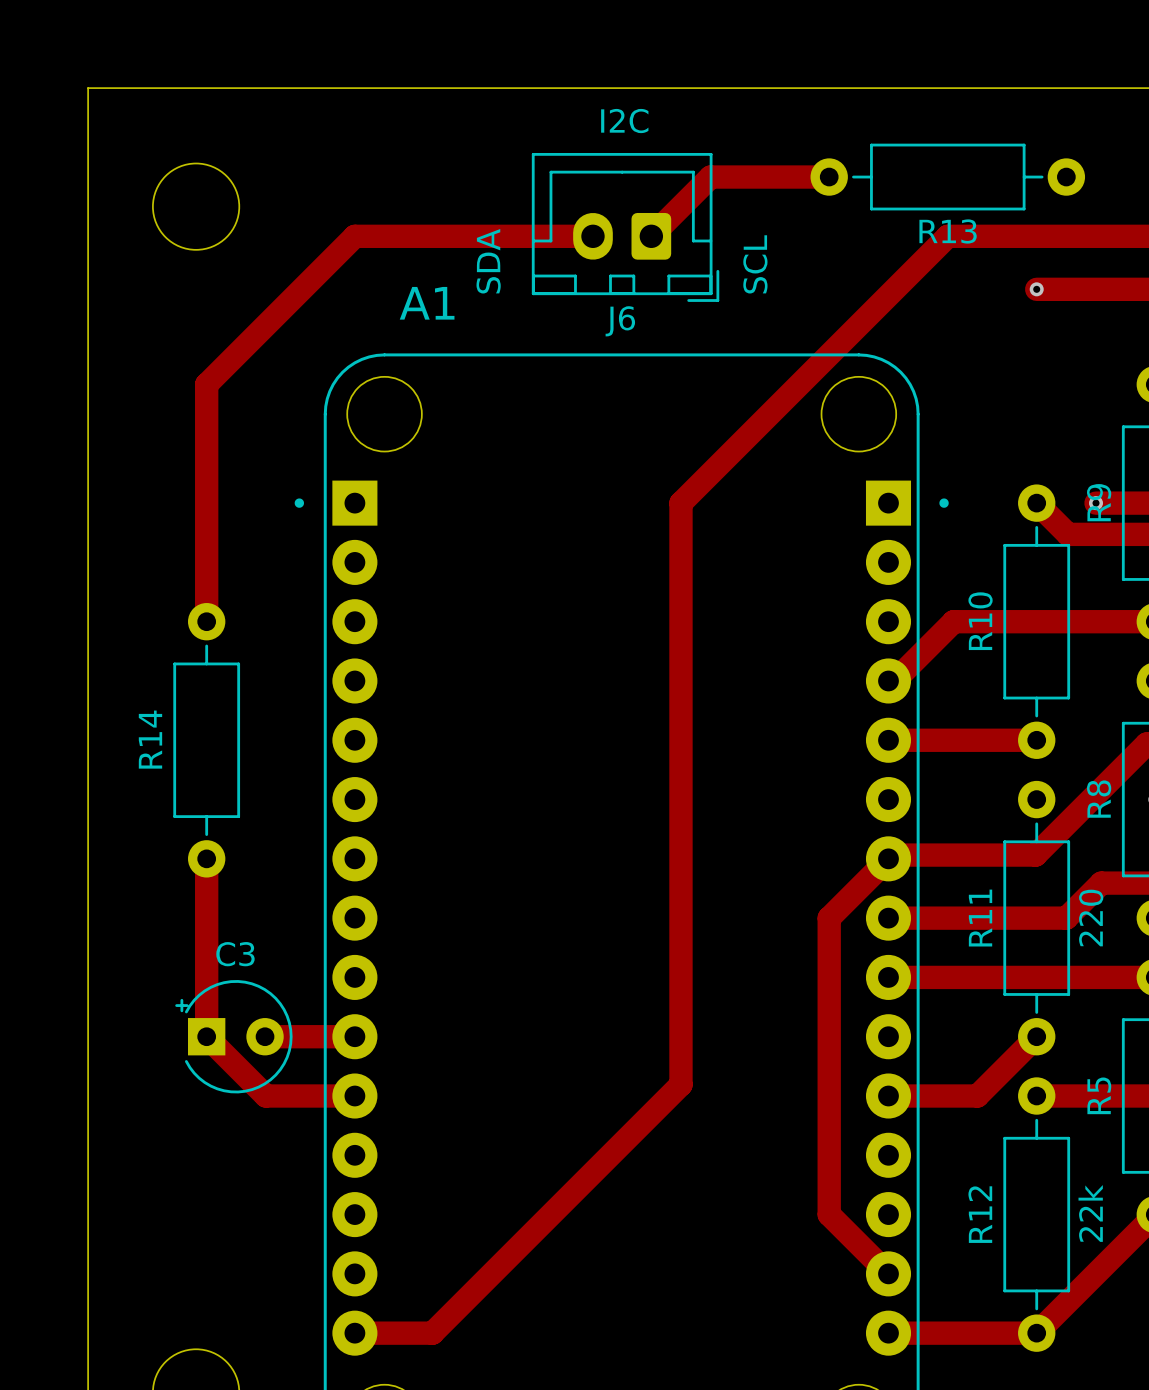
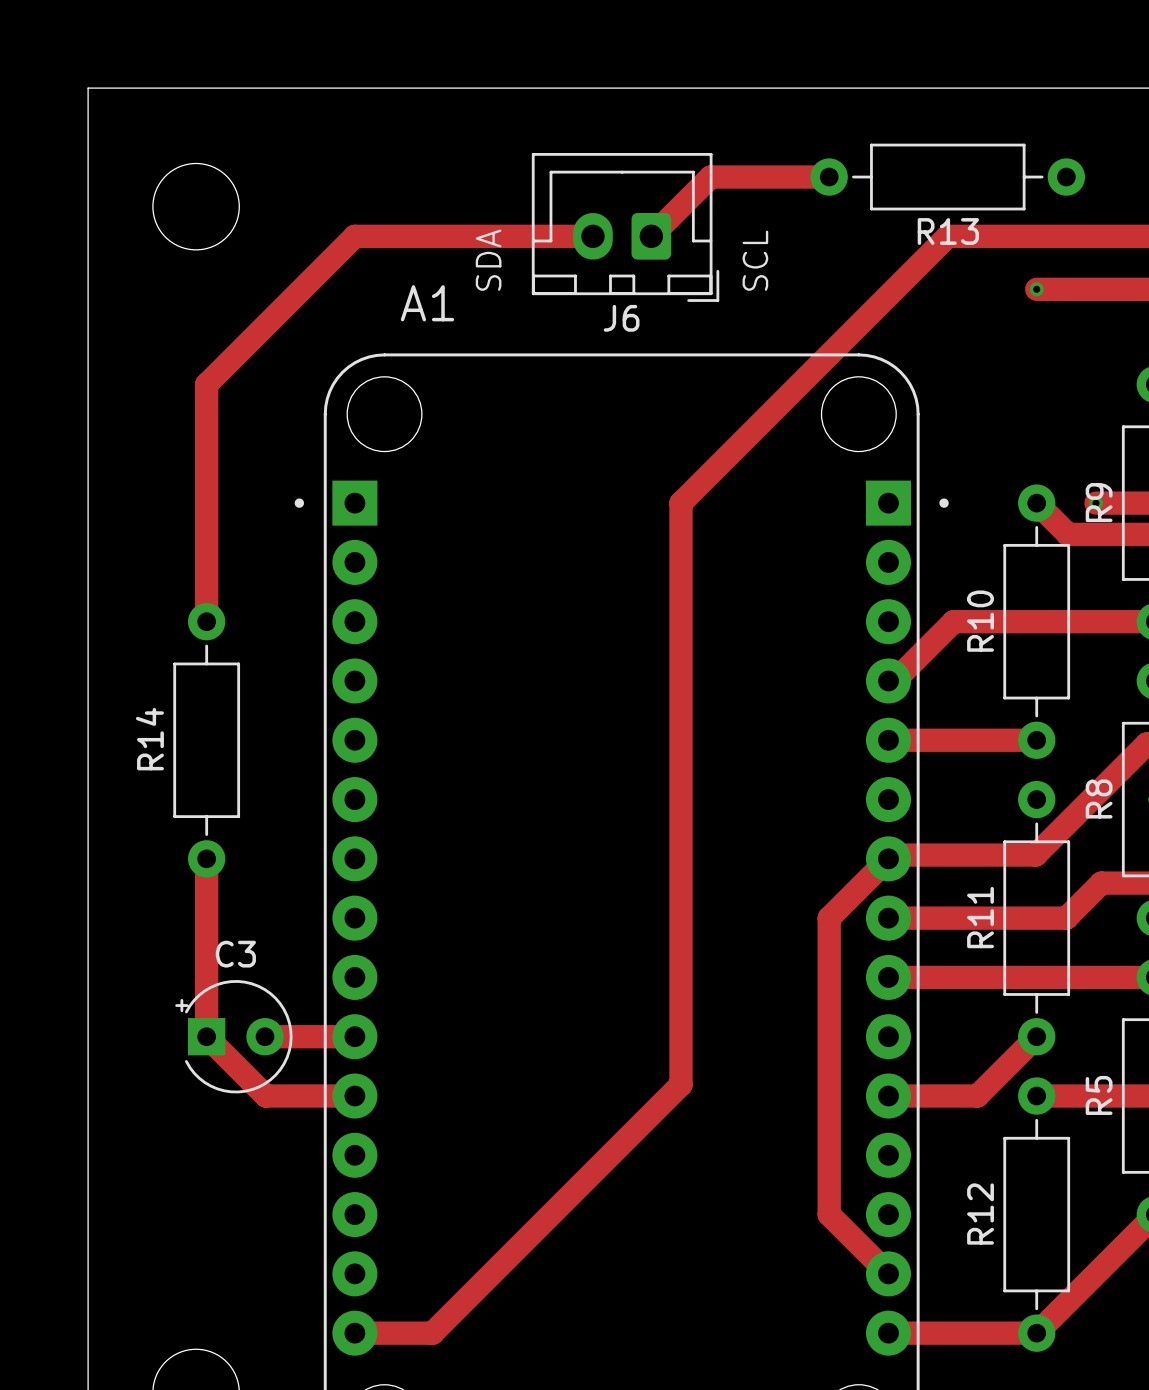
text: I2C (624, 121) -> none
R11 value: 220 (1091, 918) -> none
R12 value: 22k (1090, 1213) -> none

